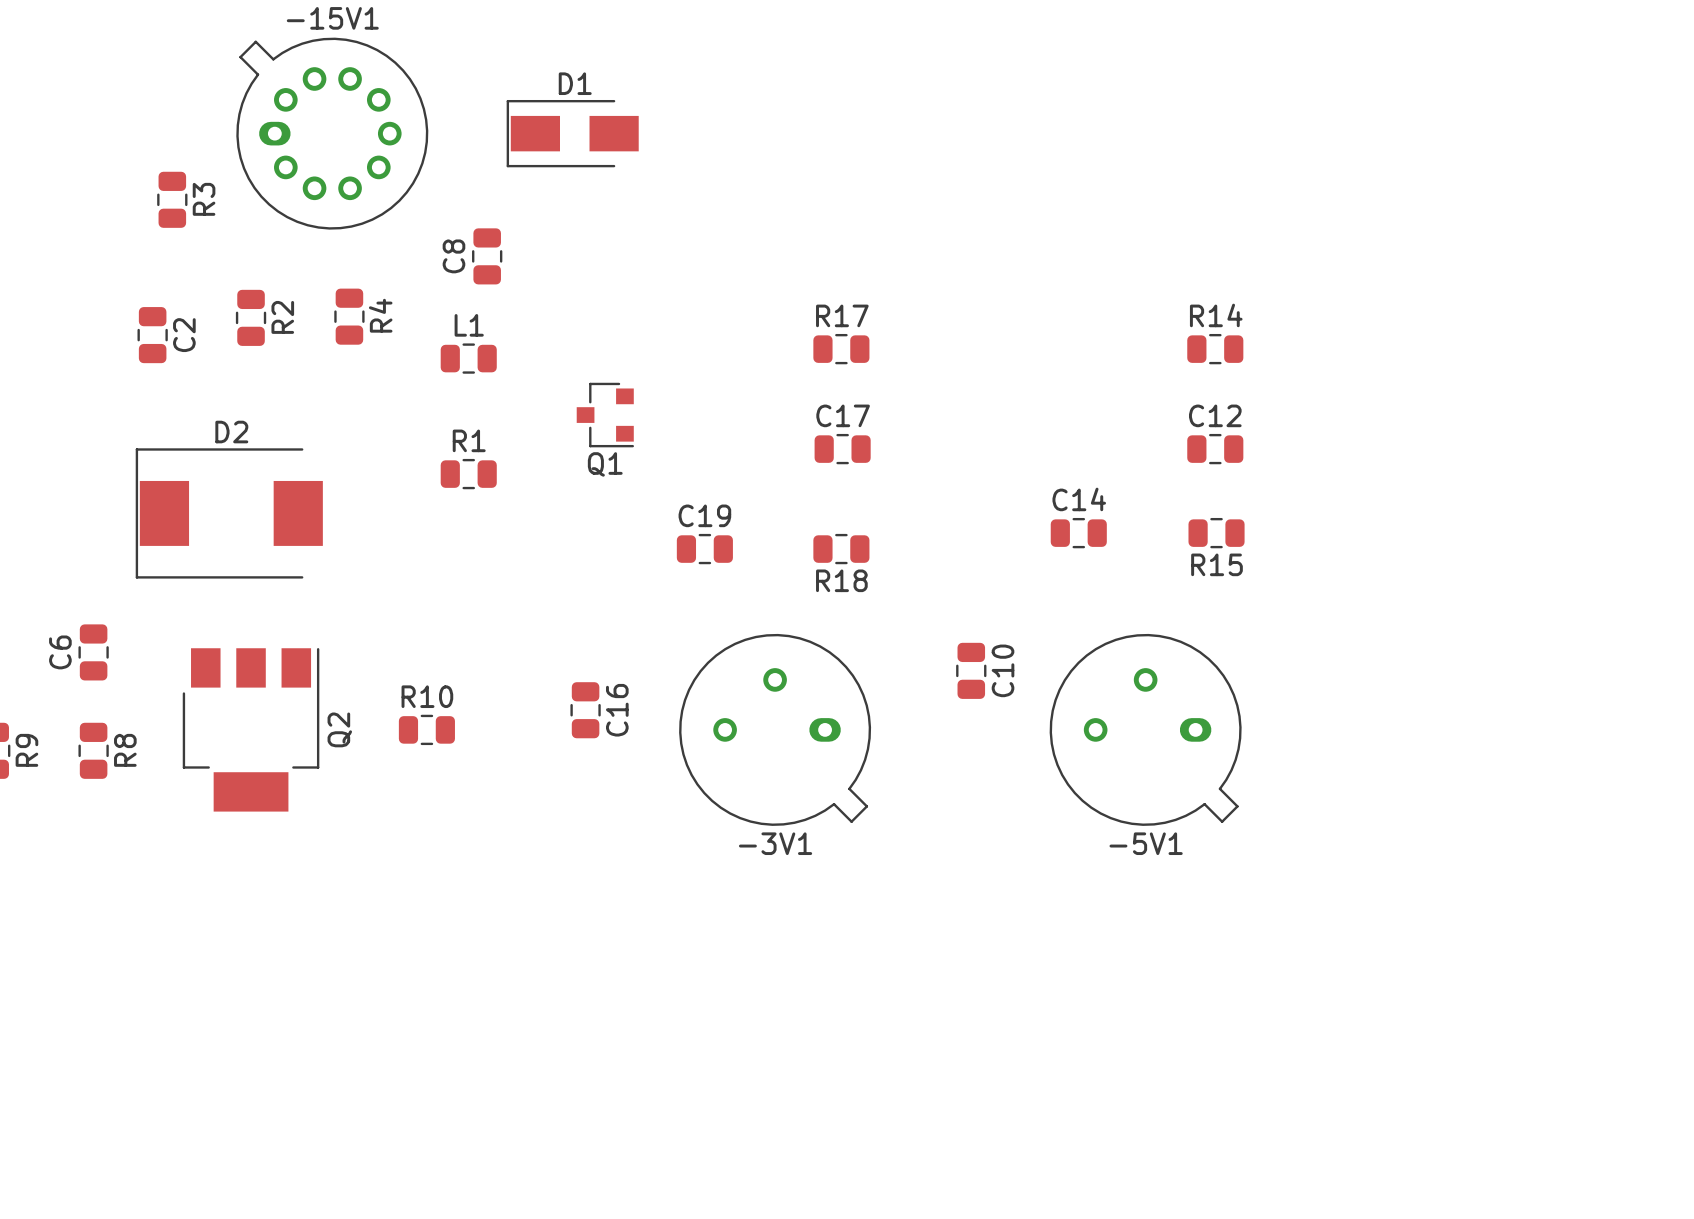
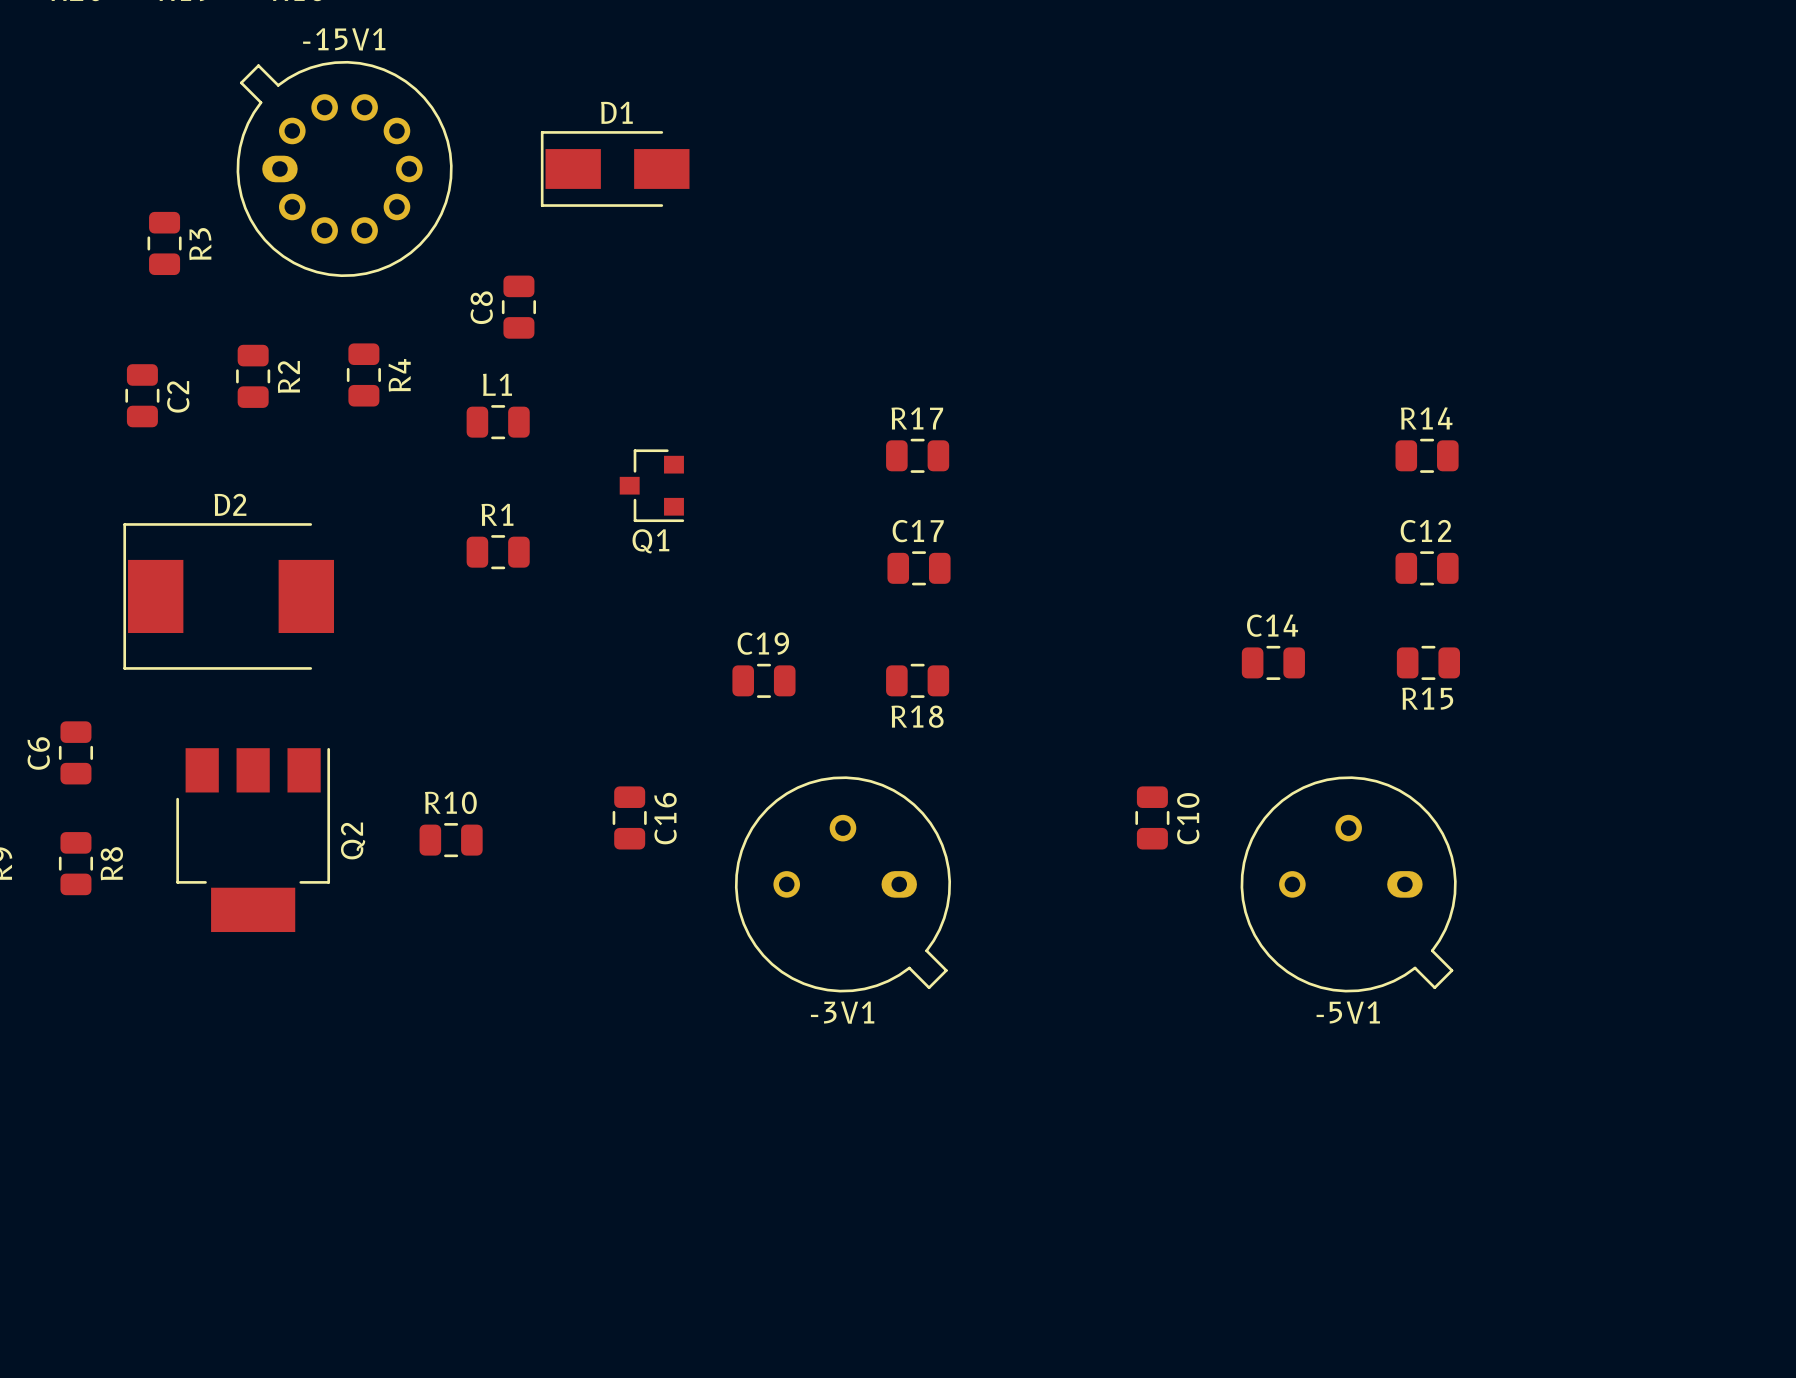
R17 position: (841, 349) -> (917, 455)
R14 position: (1215, 349) -> (1427, 455)
C17 position: (842, 449) -> (919, 568)
C12 position: (1215, 449) -> (1427, 568)
C14 position: (1078, 533) -> (1273, 662)
R15 position: (1216, 533) -> (1428, 662)
C19 position: (704, 549) -> (763, 680)
R18 position: (841, 549) -> (917, 680)
C10 position: (971, 670) -> (1152, 817)
-3V1 position: (775, 729) -> (842, 884)
-5V1 position: (1145, 729) -> (1348, 884)

